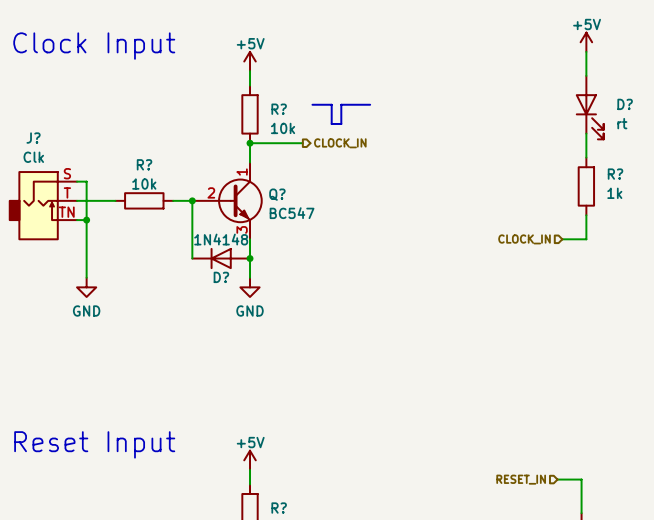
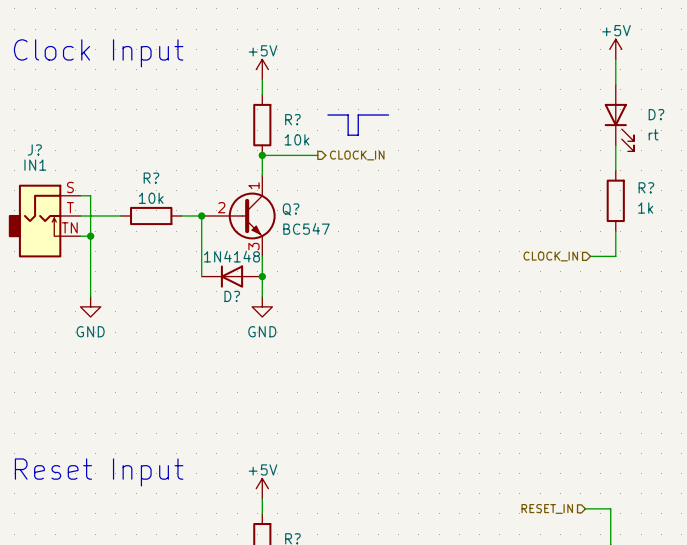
J? value: Clk (33, 157) -> IN1 (35, 165)

